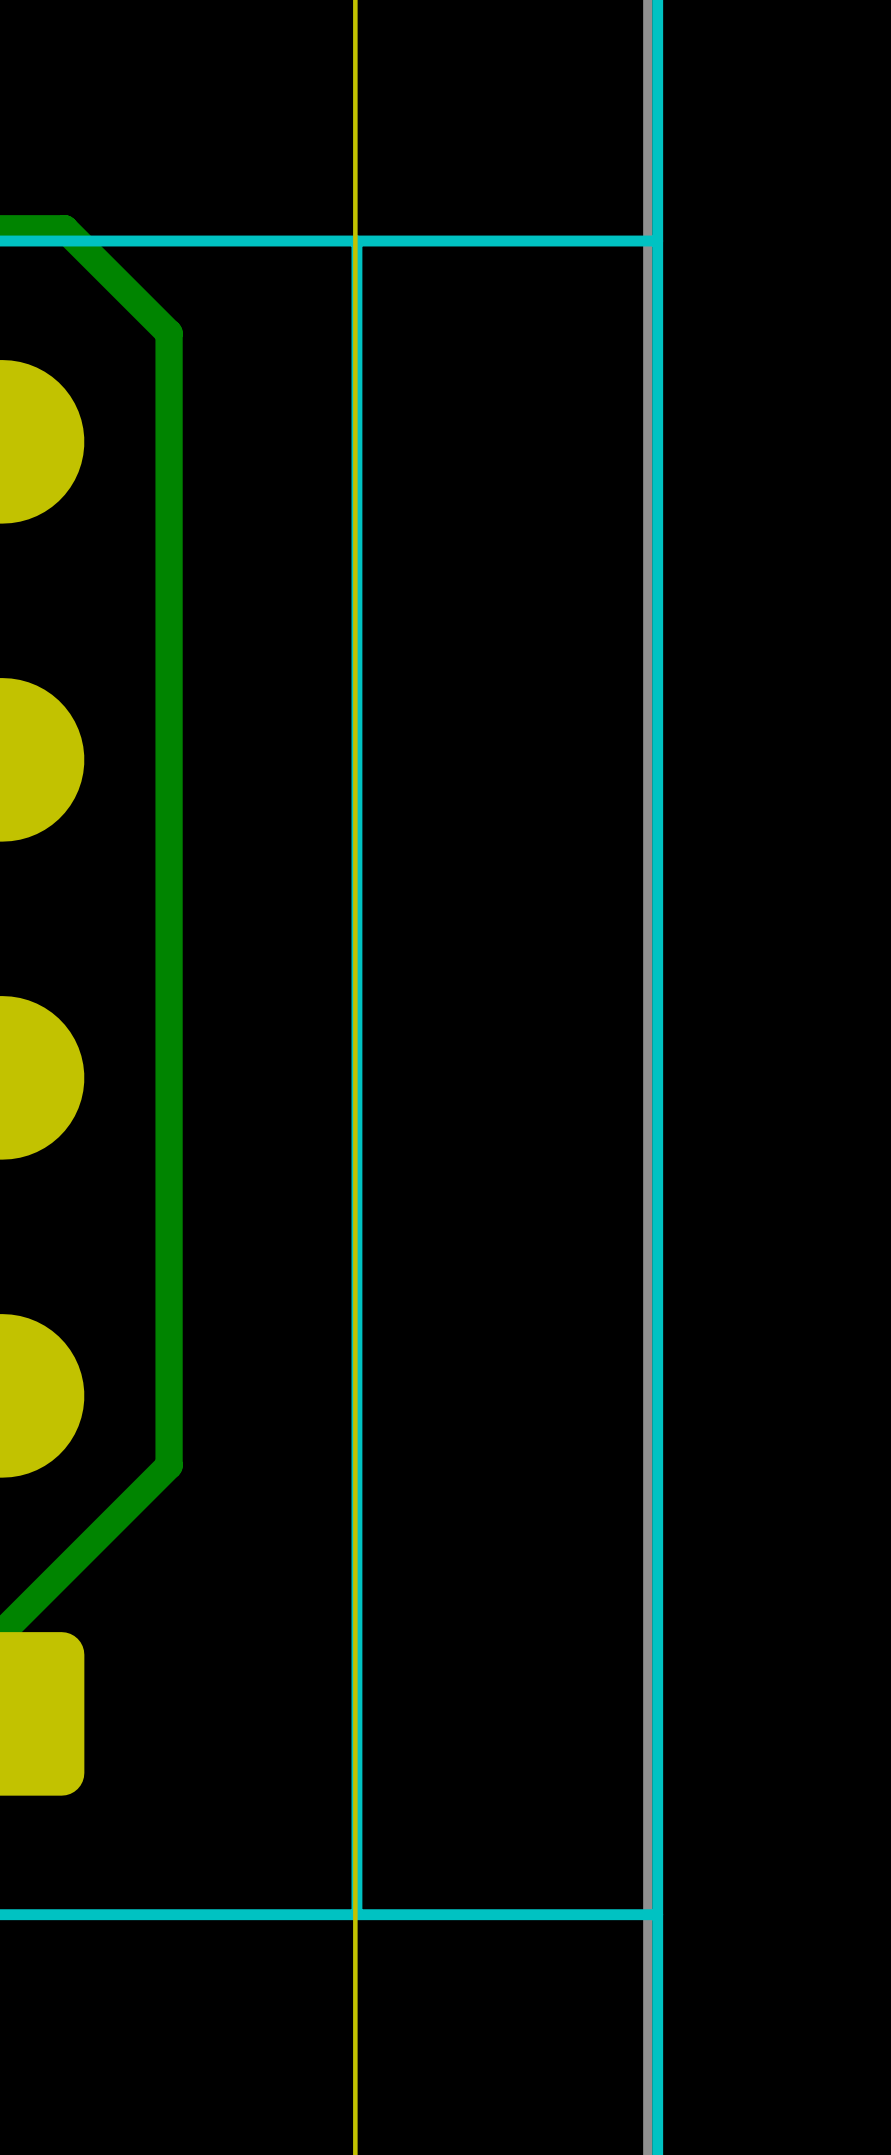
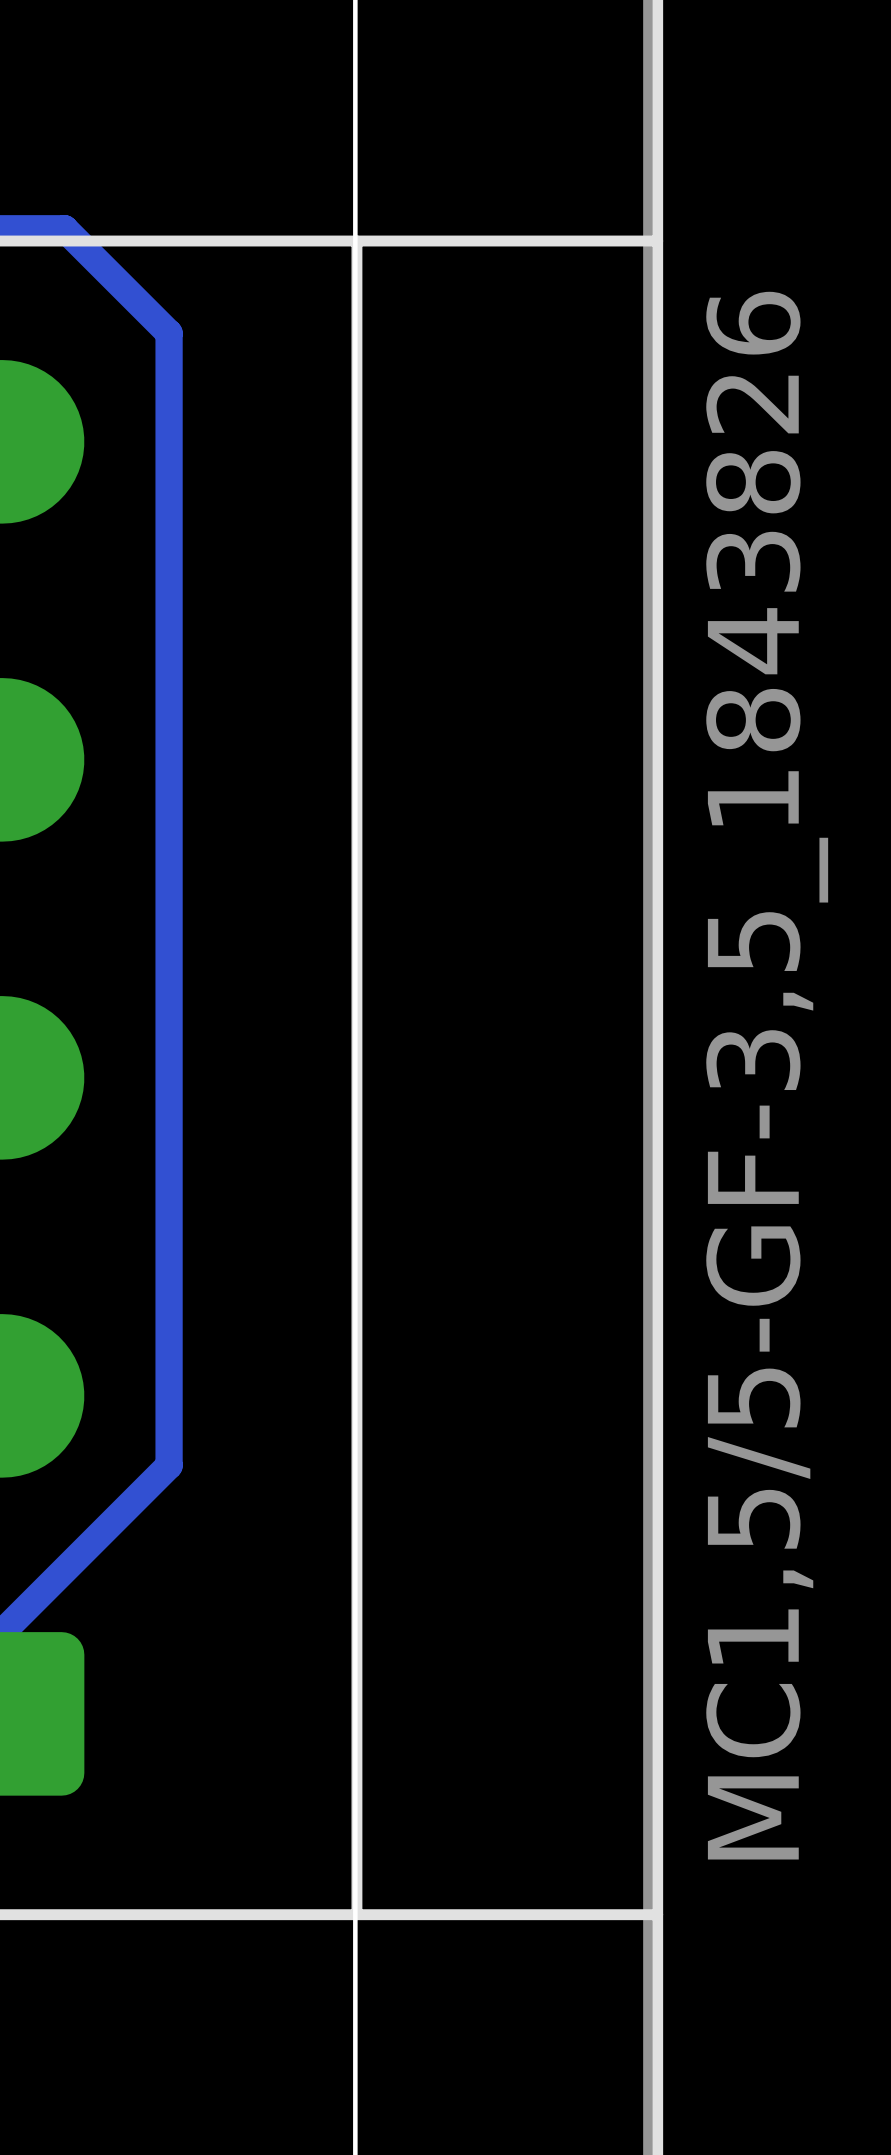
part value: none -> MC1,5/5-GF-3,5_1843826 (767, 1075)

